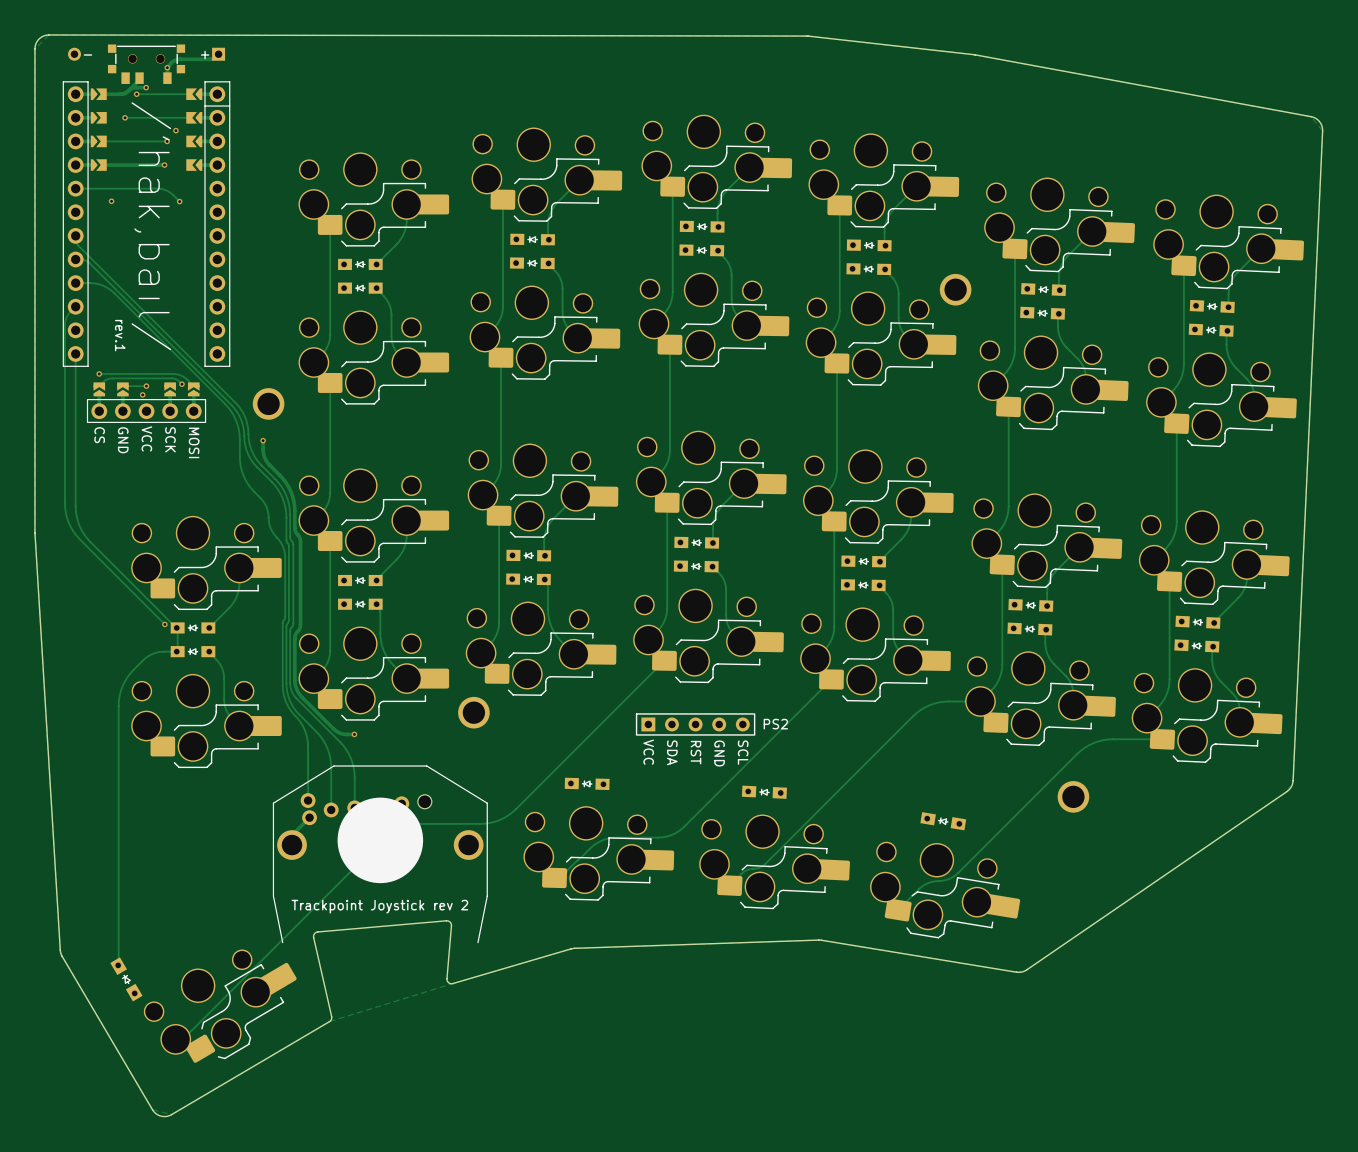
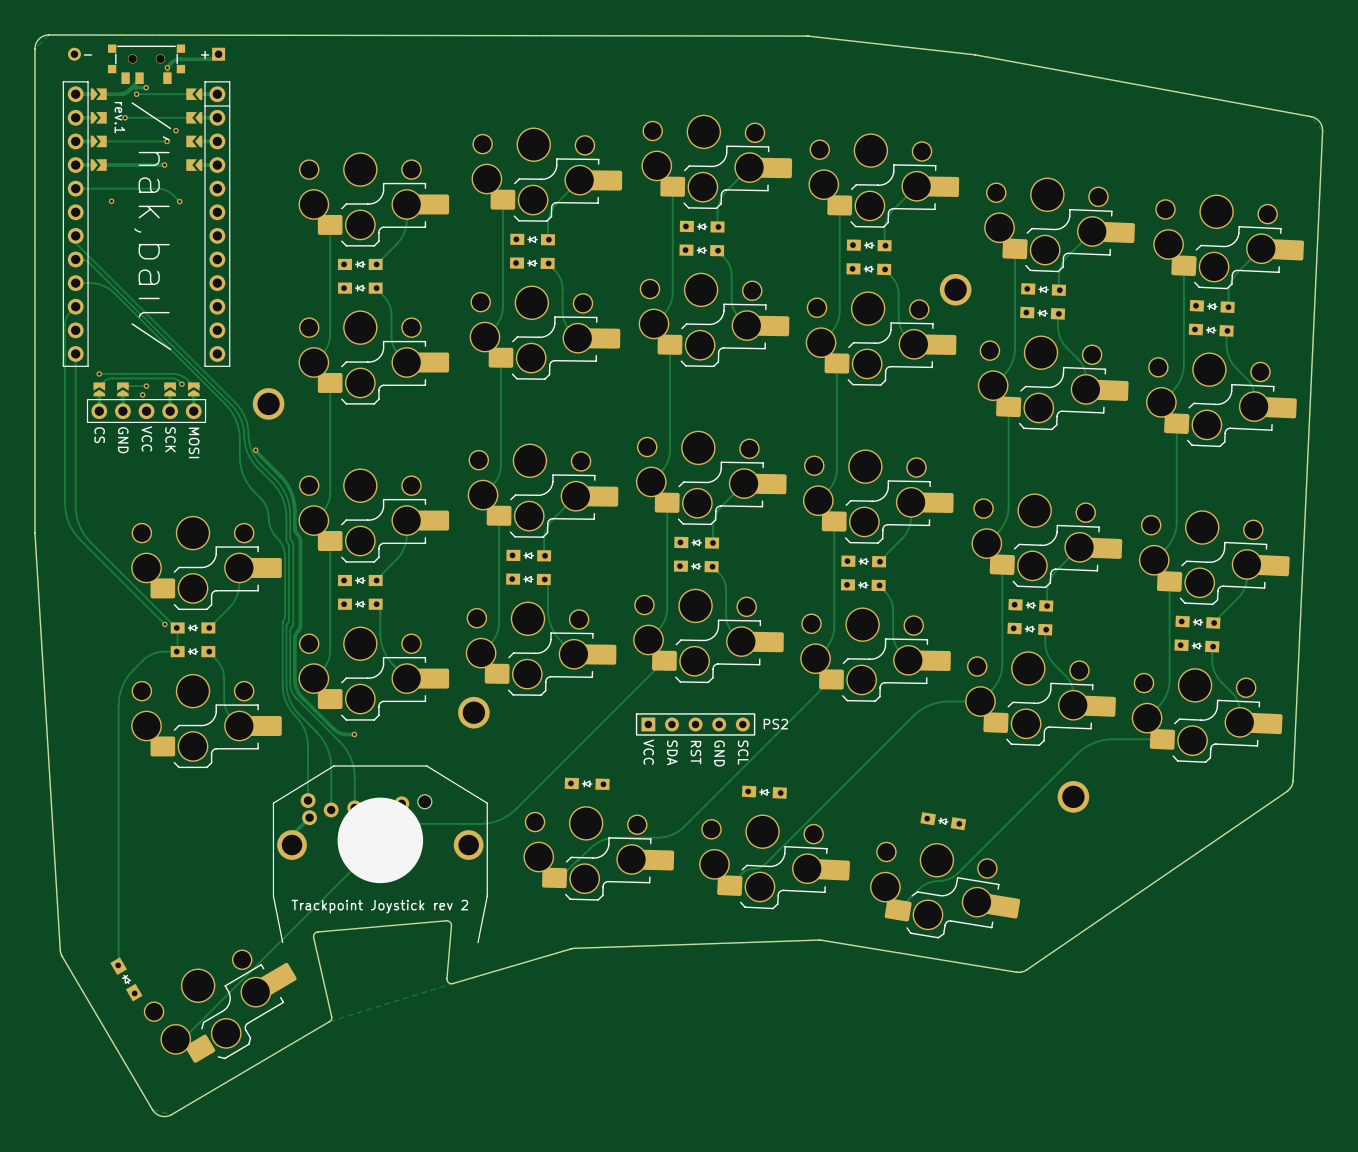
text position: rev.1 (120, 335) -> rev.1 (119, 117)
track: (263, 440) (263, 455) (269, 464) -> (255, 450) (269, 464)
via position: (263, 440) -> (255, 450)

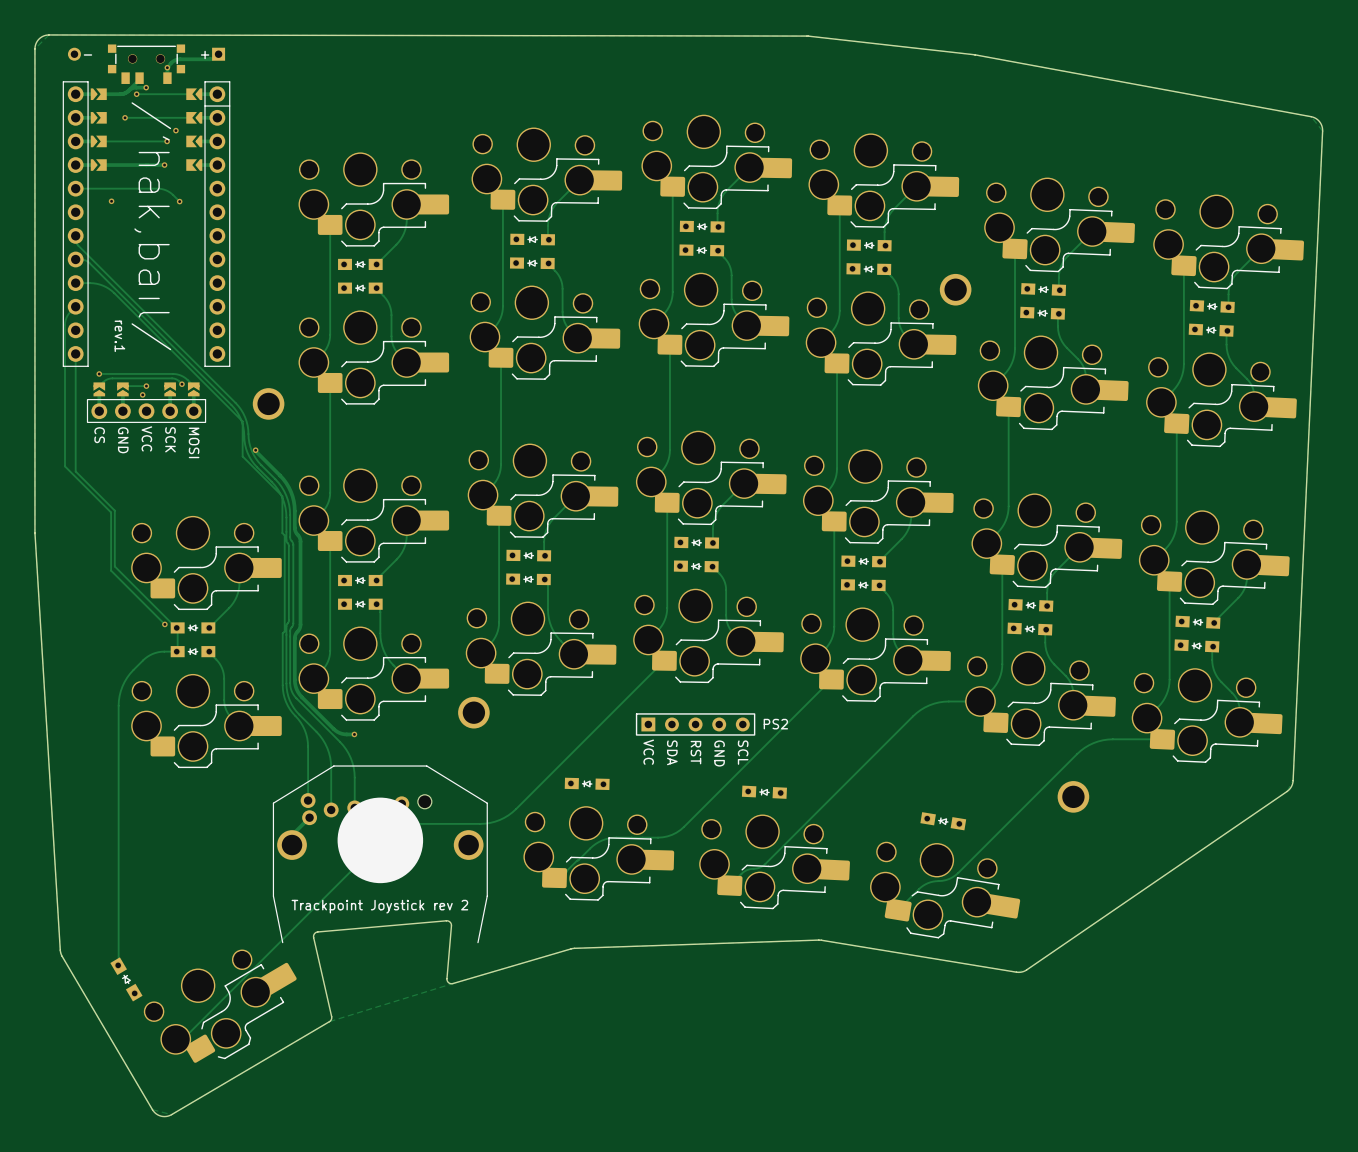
text position: rev.1 (119, 117) -> rev.1 (119, 336)
track: (225, 403) (237, 424) (240, 461) (243, 475) (251, 488) (265, 504) (270, 528) (276, 537) -> (225, 403) (242, 421) (242, 456) (282, 496) (282, 533) (284, 535) (284, 631) (282, 633)
track: (64, 466) (65, 508) (68, 522) (76, 535) (111, 570) -> (64, 466) (111, 512) (111, 570)
track: (75, 471) (75, 511) (79, 525) (87, 538) (114, 566) -> (75, 471) (114, 510) (114, 566)
track: (276, 537) (281, 544) (285, 554) (285, 617) (282, 622) (282, 633) -> none

